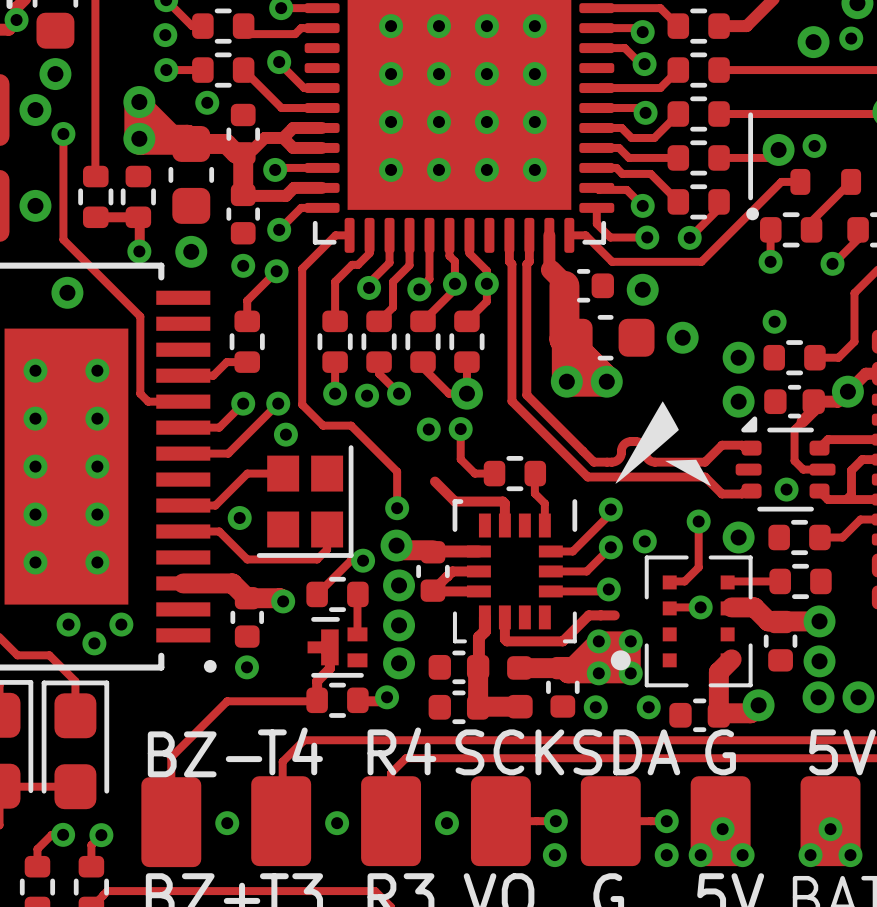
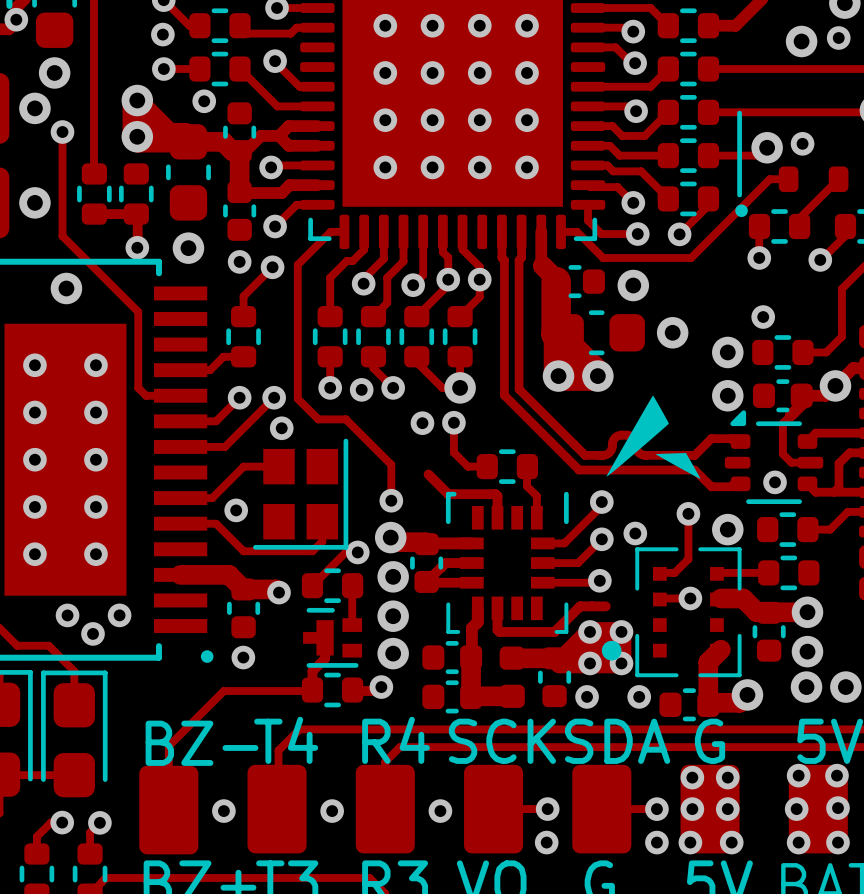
via: none -> (798, 775)
via: none -> (836, 775)
via: none -> (692, 777)
via: none -> (727, 777)
via: none -> (838, 808)
via: none -> (692, 809)
via: none -> (727, 809)
via: none -> (796, 809)
via: (722, 829) -> none
via: (830, 829) -> none

